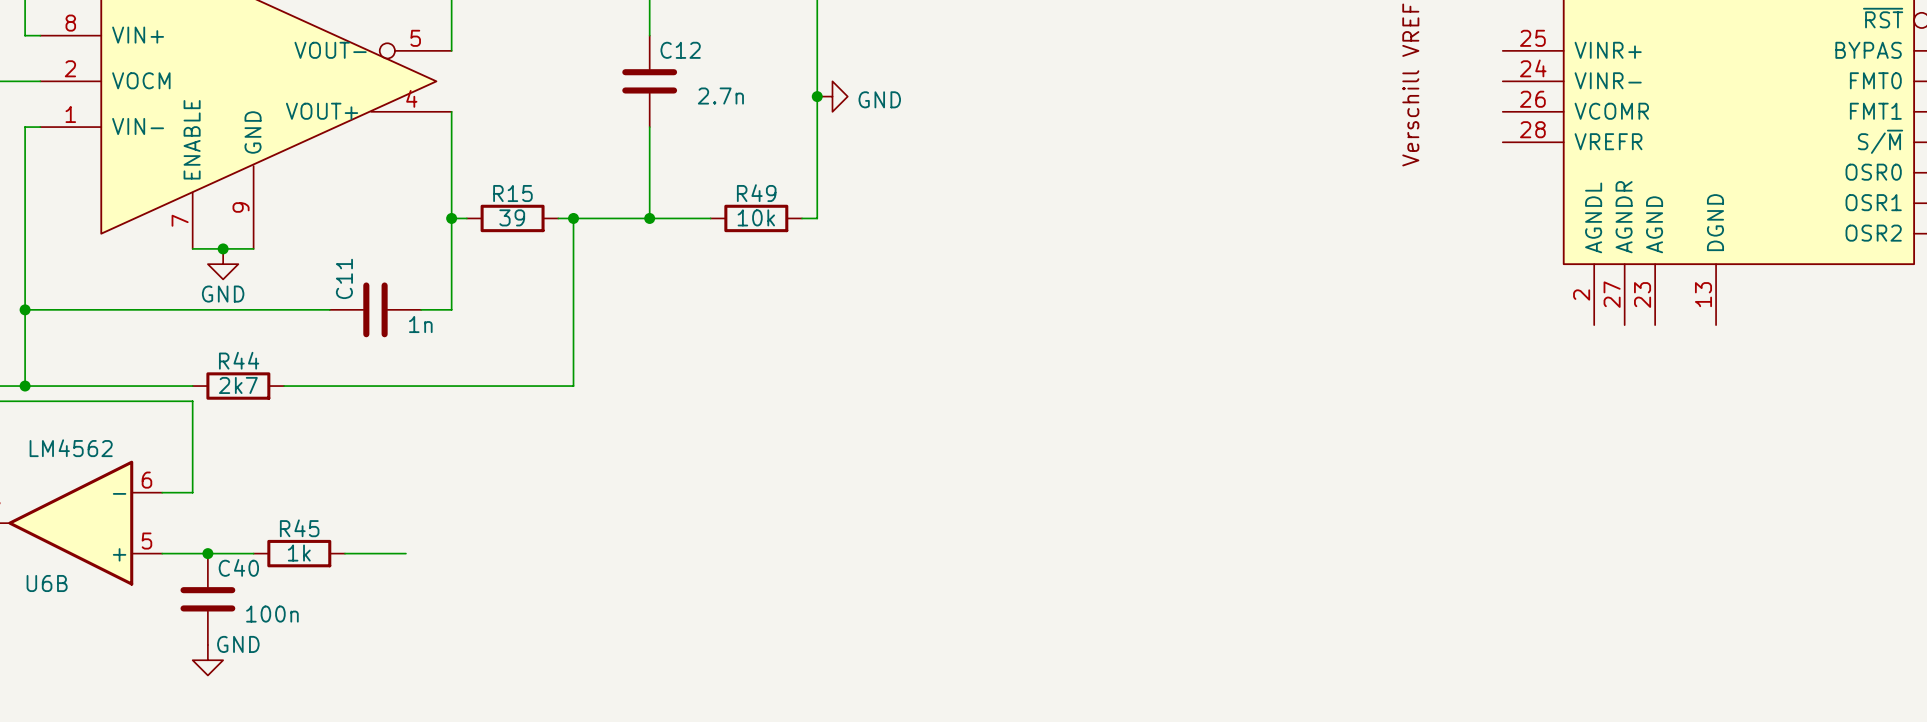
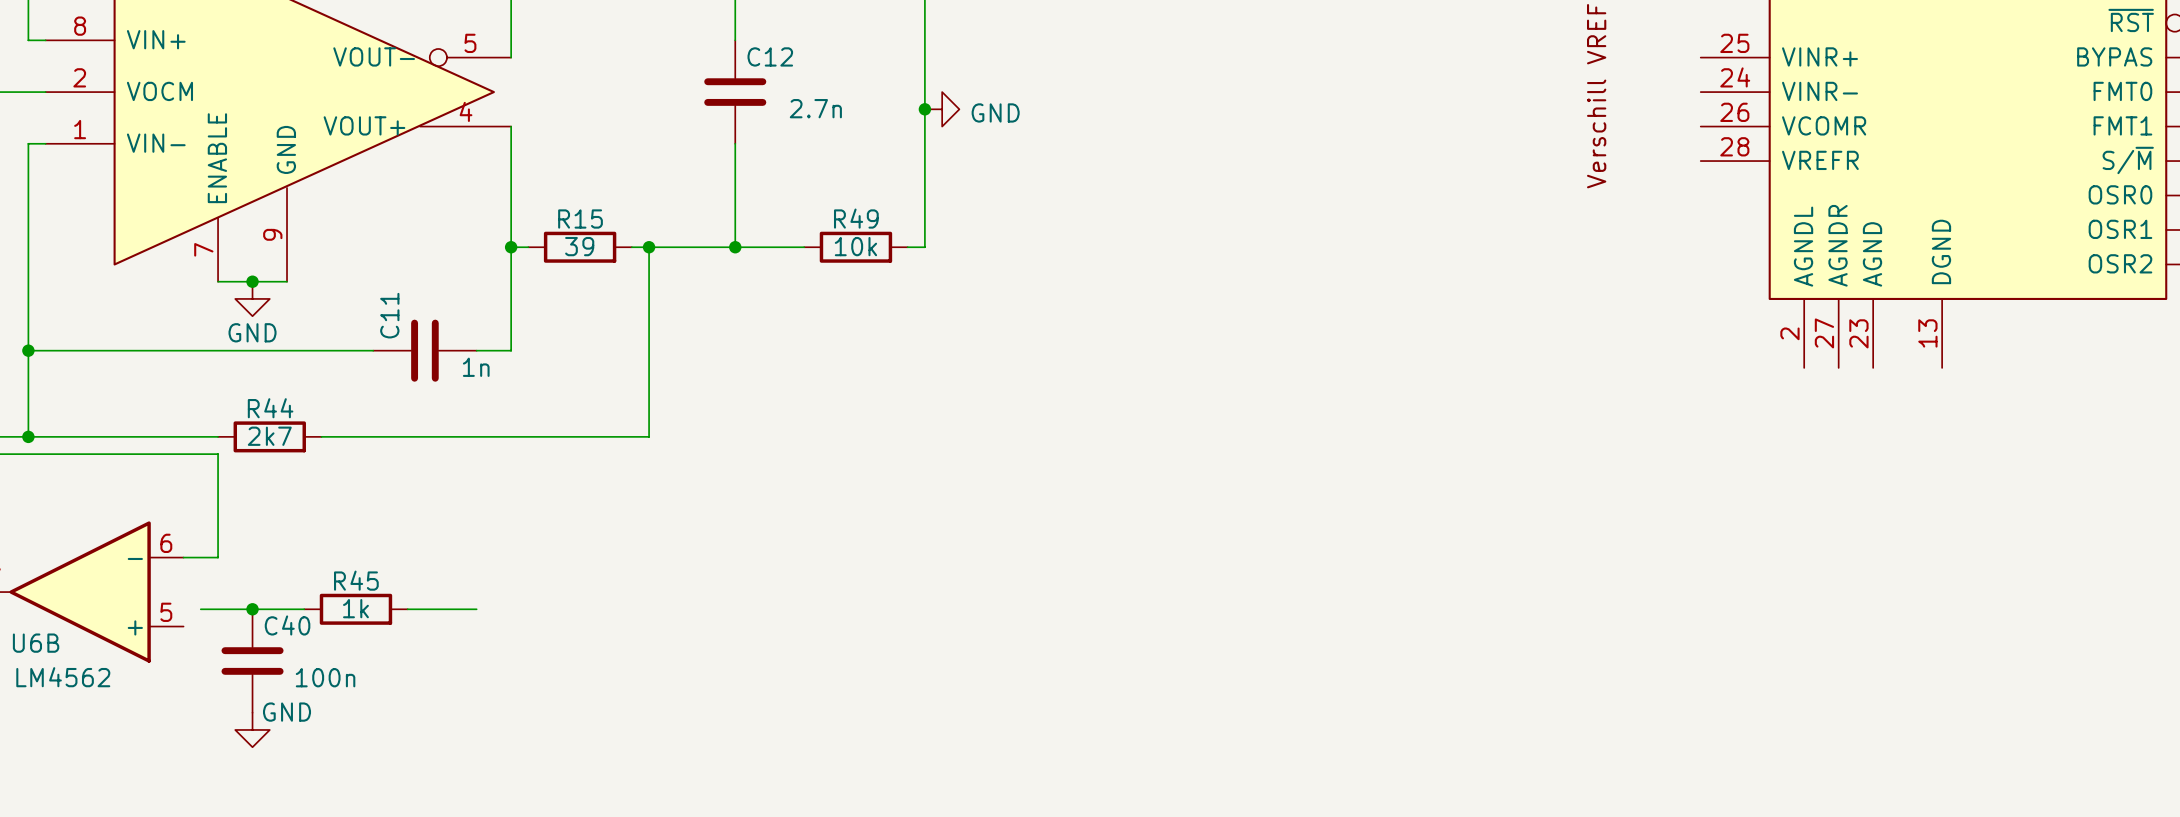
U6B value position: LM4562 (71, 448) -> LM4562 (63, 677)
wire: (162, 553) (253, 553) -> (200, 609) (304, 609)
junction position: (207, 553) -> (252, 609)
R45 position: (299, 553) -> (355, 609)
wire: (345, 553) (405, 553) -> (407, 609) (476, 609)
U6B name position: U6B (47, 583) -> U6B (36, 643)
C40 position: (207, 599) -> (252, 661)
power symbol position: GND (207, 660) -> GND (252, 729)

